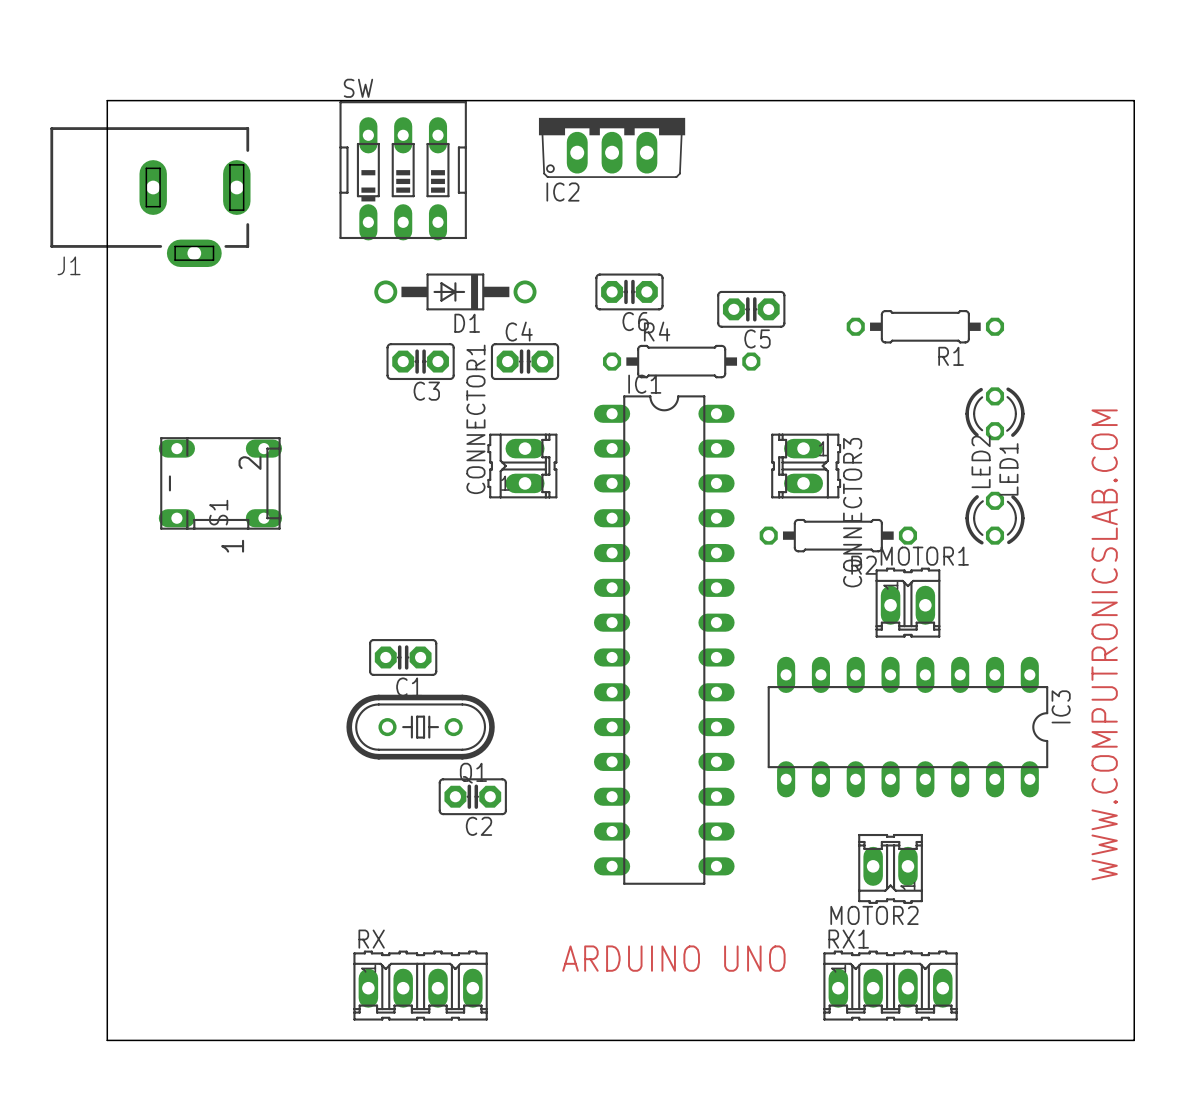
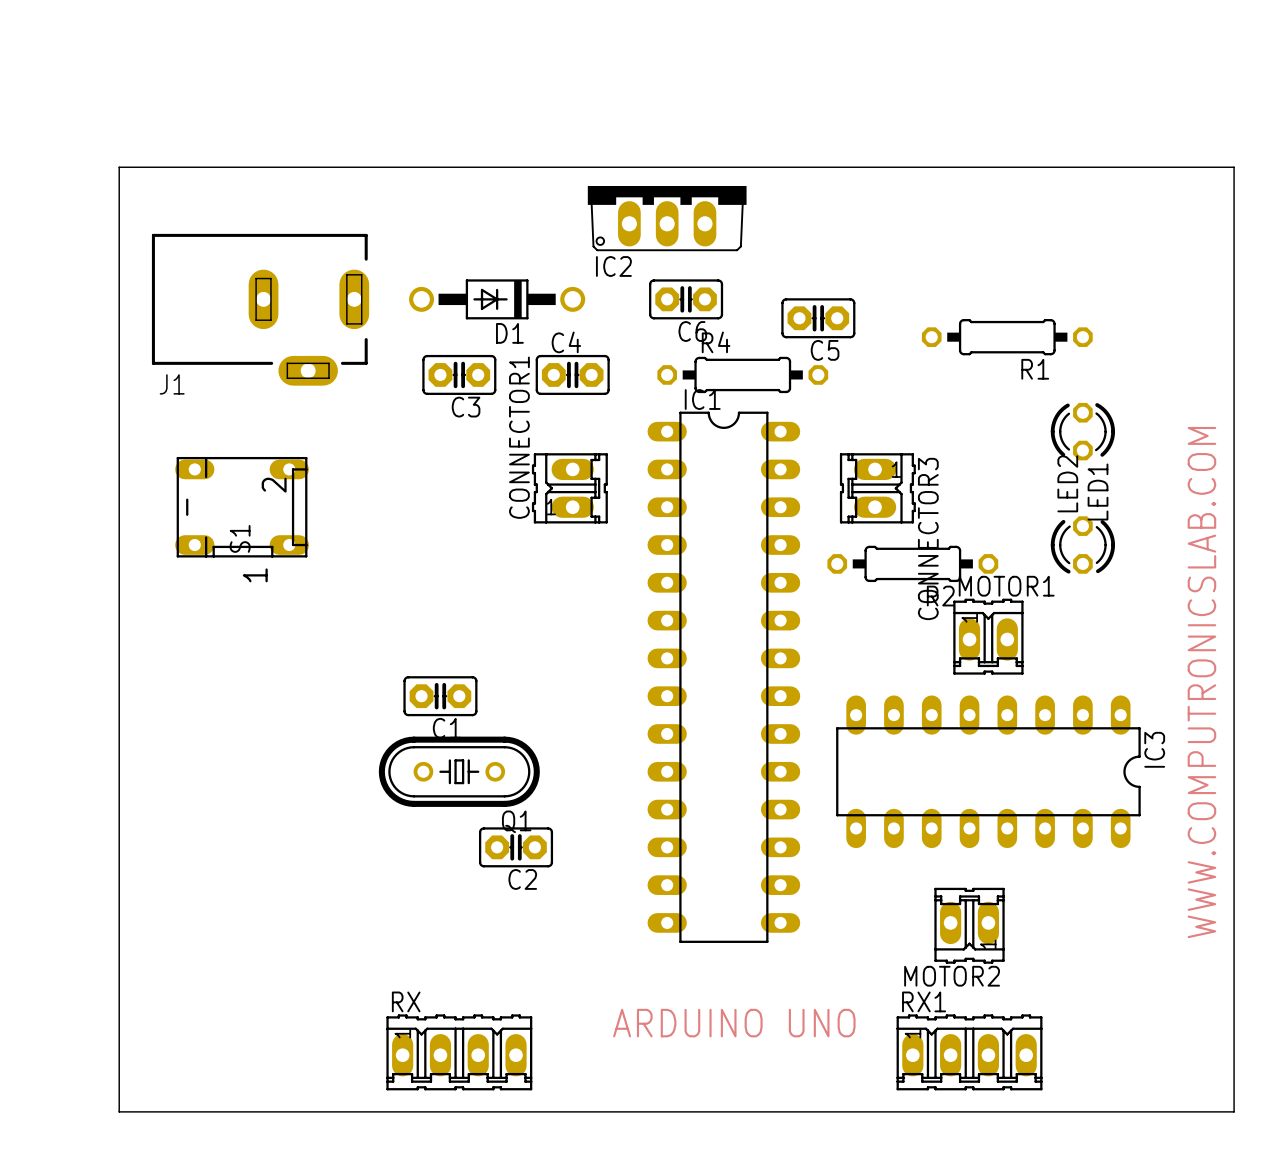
IC2 position: (612, 147) -> (667, 218)
board edge: (107, 170) (107, 100) (1134, 100) (1134, 170) -> (119, 167) (1234, 167)
SW: (403, 170) -> none
J1 position: (150, 197) -> (260, 309)

